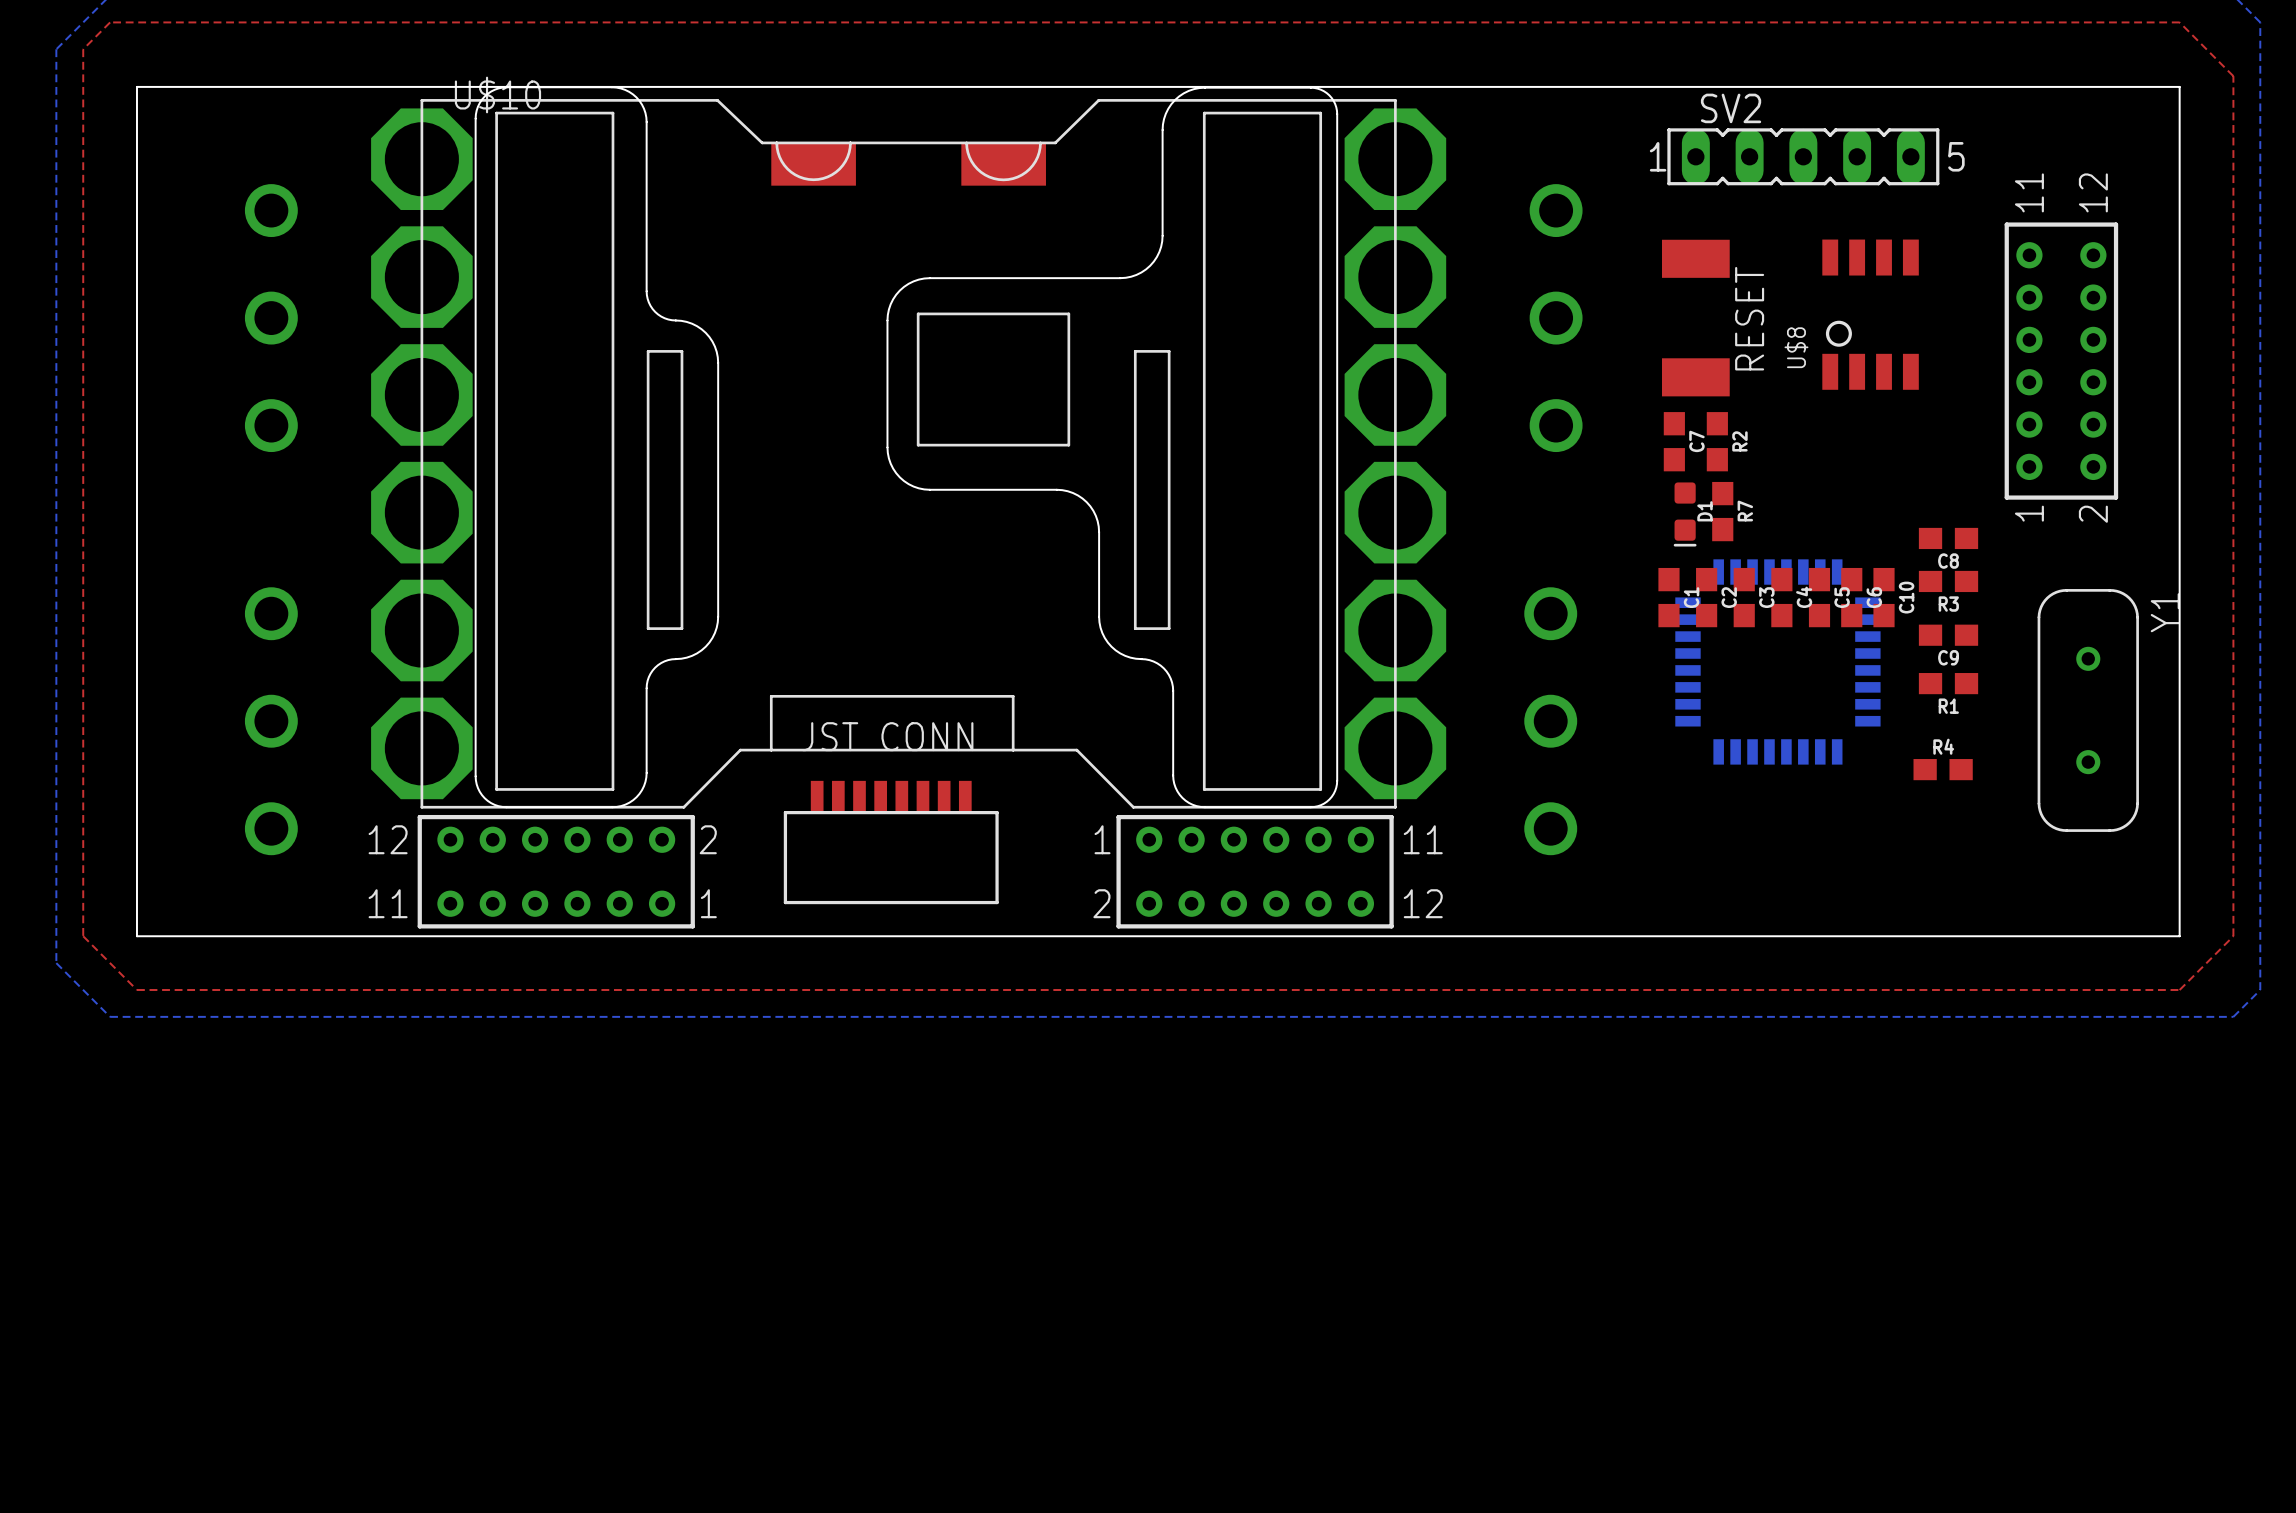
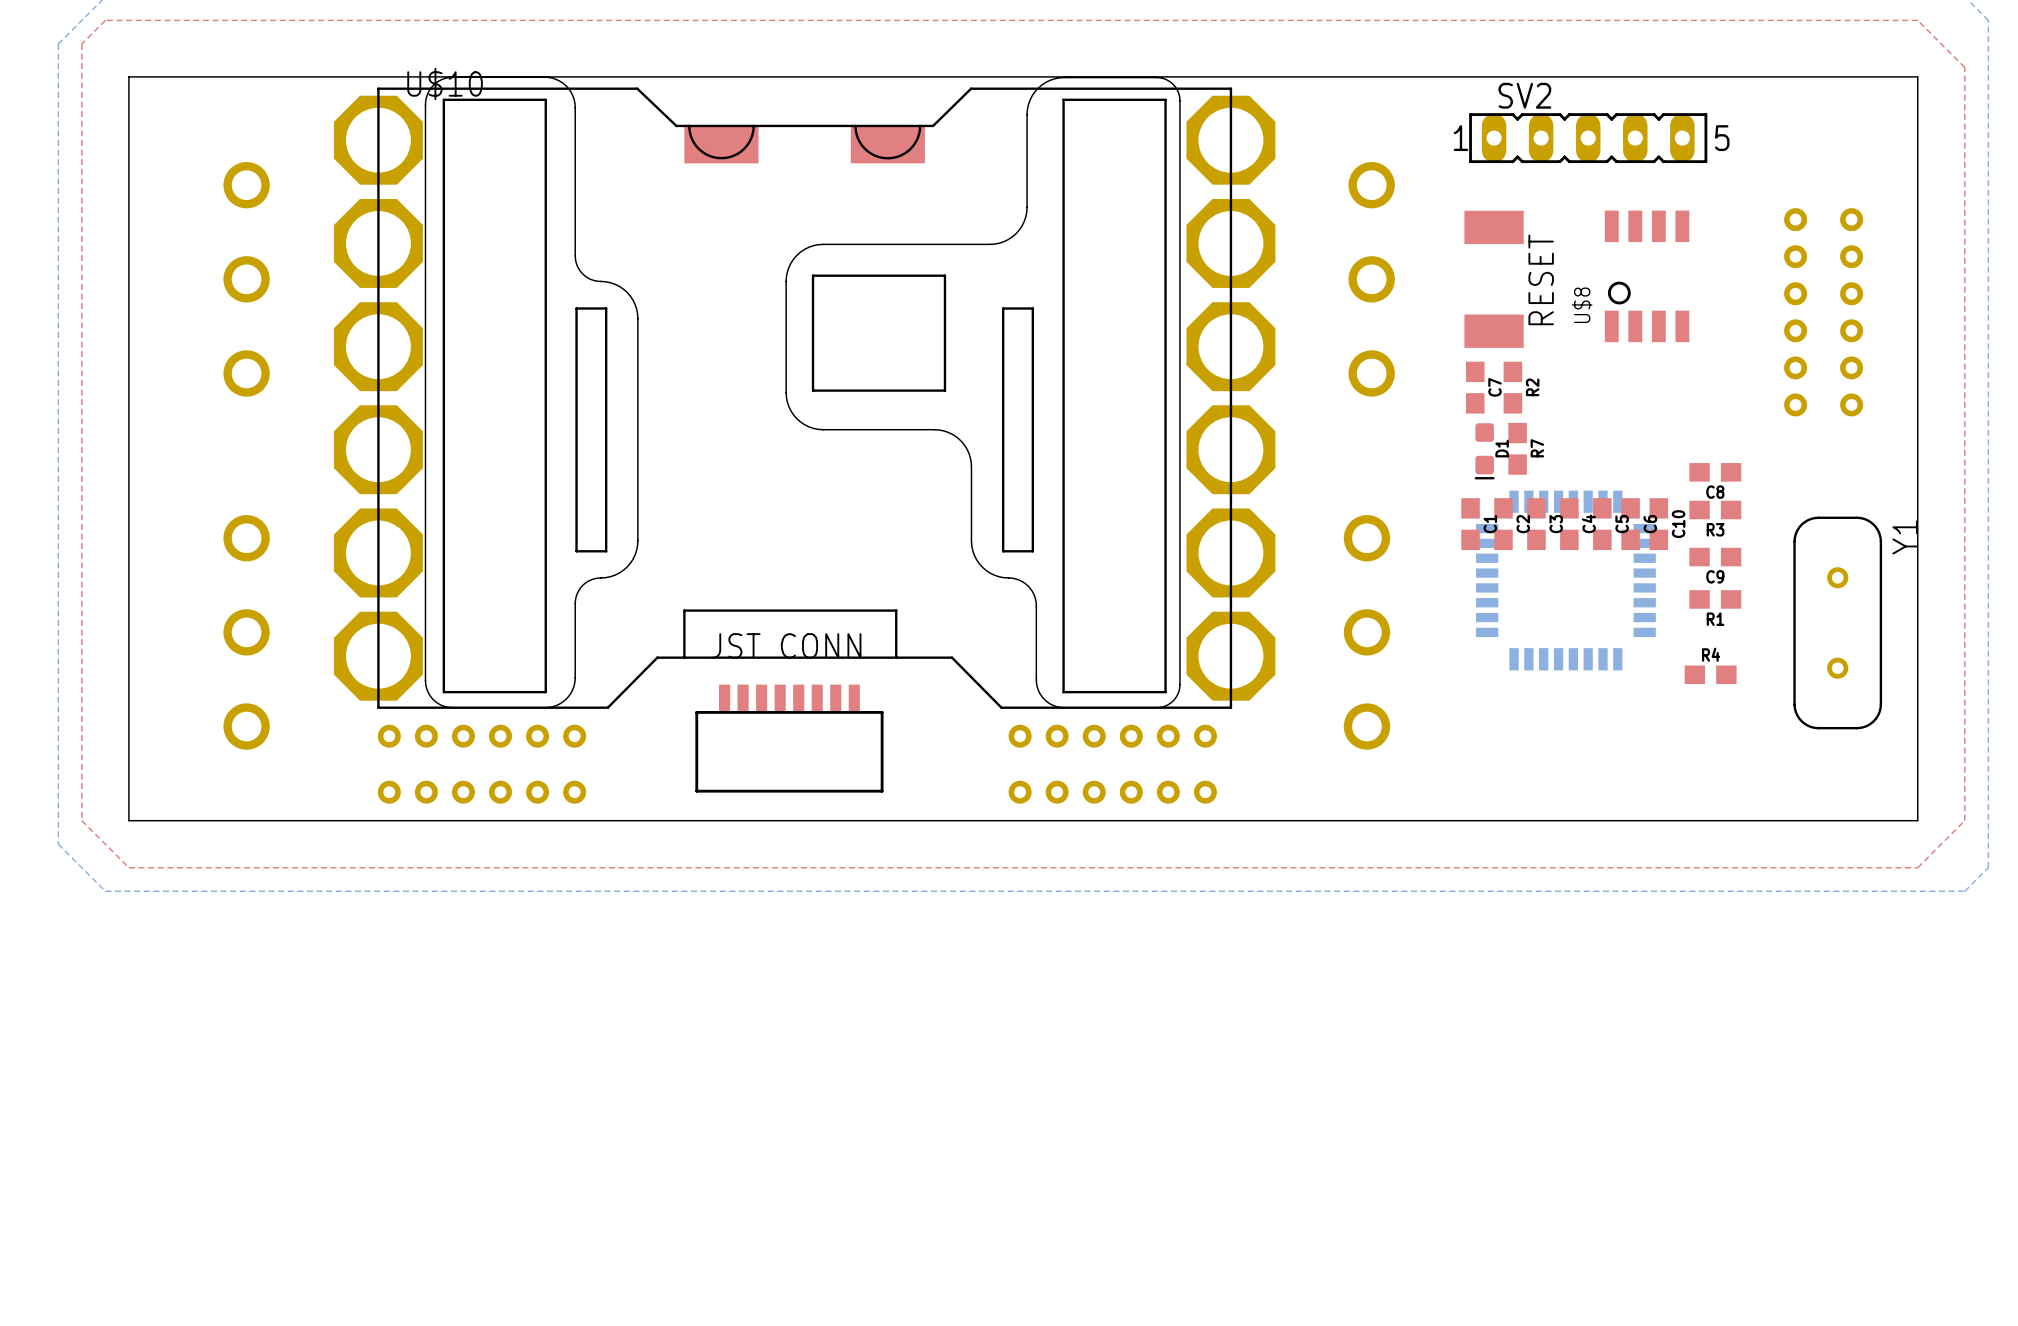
part side: top (2061, 361) -> bottom (1823, 312)
part side: top (556, 871) -> bottom (481, 764)
part side: top (1255, 871) -> bottom (1112, 764)

